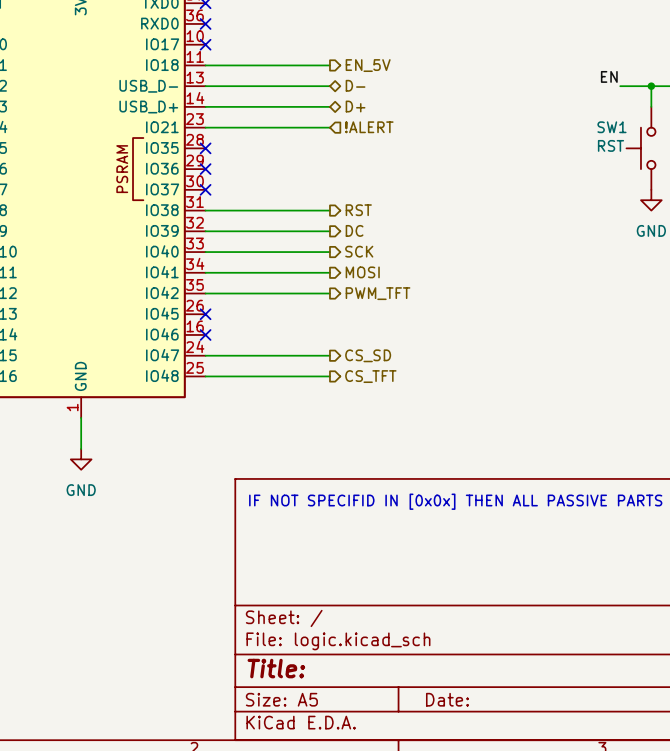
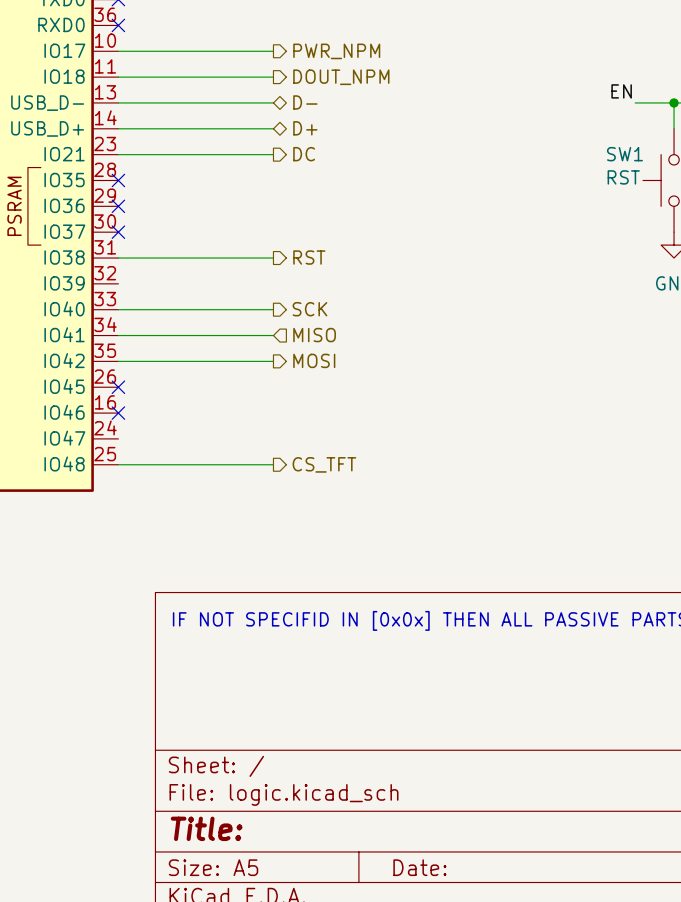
no-connect mark: (205, 44) -> none
hierarchical label: none -> PWR_NPM (336, 51)
hierarchical label: EN_5V (368, 65) -> DOUT_NPM (341, 77)
hierarchical label shape: input (369, 127) -> output (304, 154)
hierarchical label: !ALERT (369, 127) -> DC (304, 154)
hierarchical label: DC (354, 230) -> none
wire: (205, 231) (329, 231) -> (118, 51) (273, 51)
hierarchical label shape: output (362, 272) -> input (314, 335)
hierarchical label: MOSI (362, 272) -> MISO (314, 335)
hierarchical label: PWM_TFT (378, 293) -> MOSI (314, 360)
wire: (205, 355) (329, 355) -> none
hierarchical label: CS_SD (368, 355) -> none

